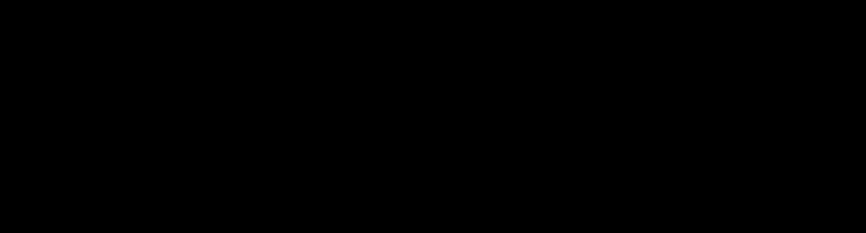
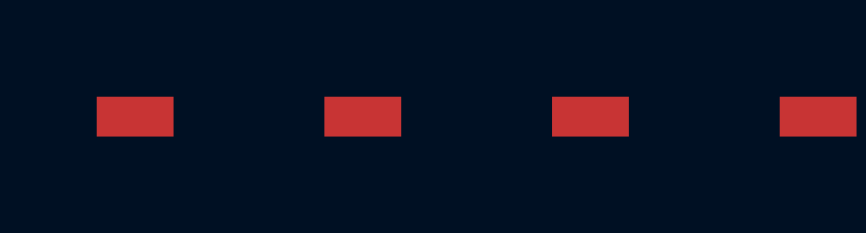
part: none -> (135, 116)
part: none -> (362, 116)
part: none -> (590, 116)
part: none -> (818, 116)

